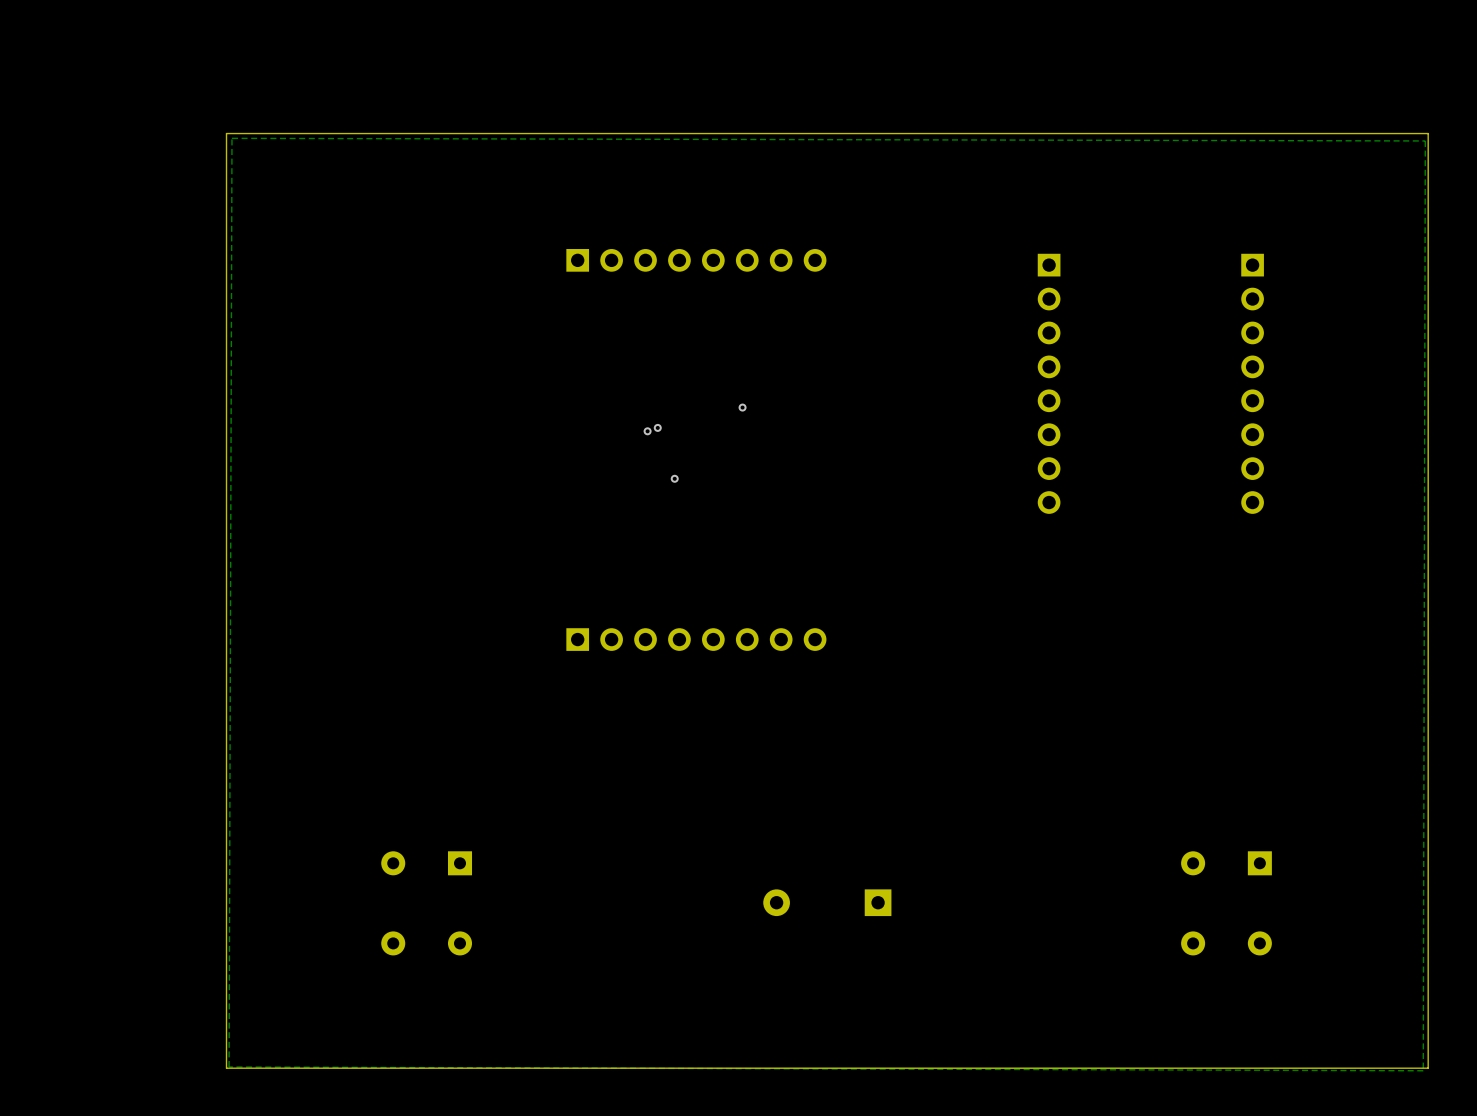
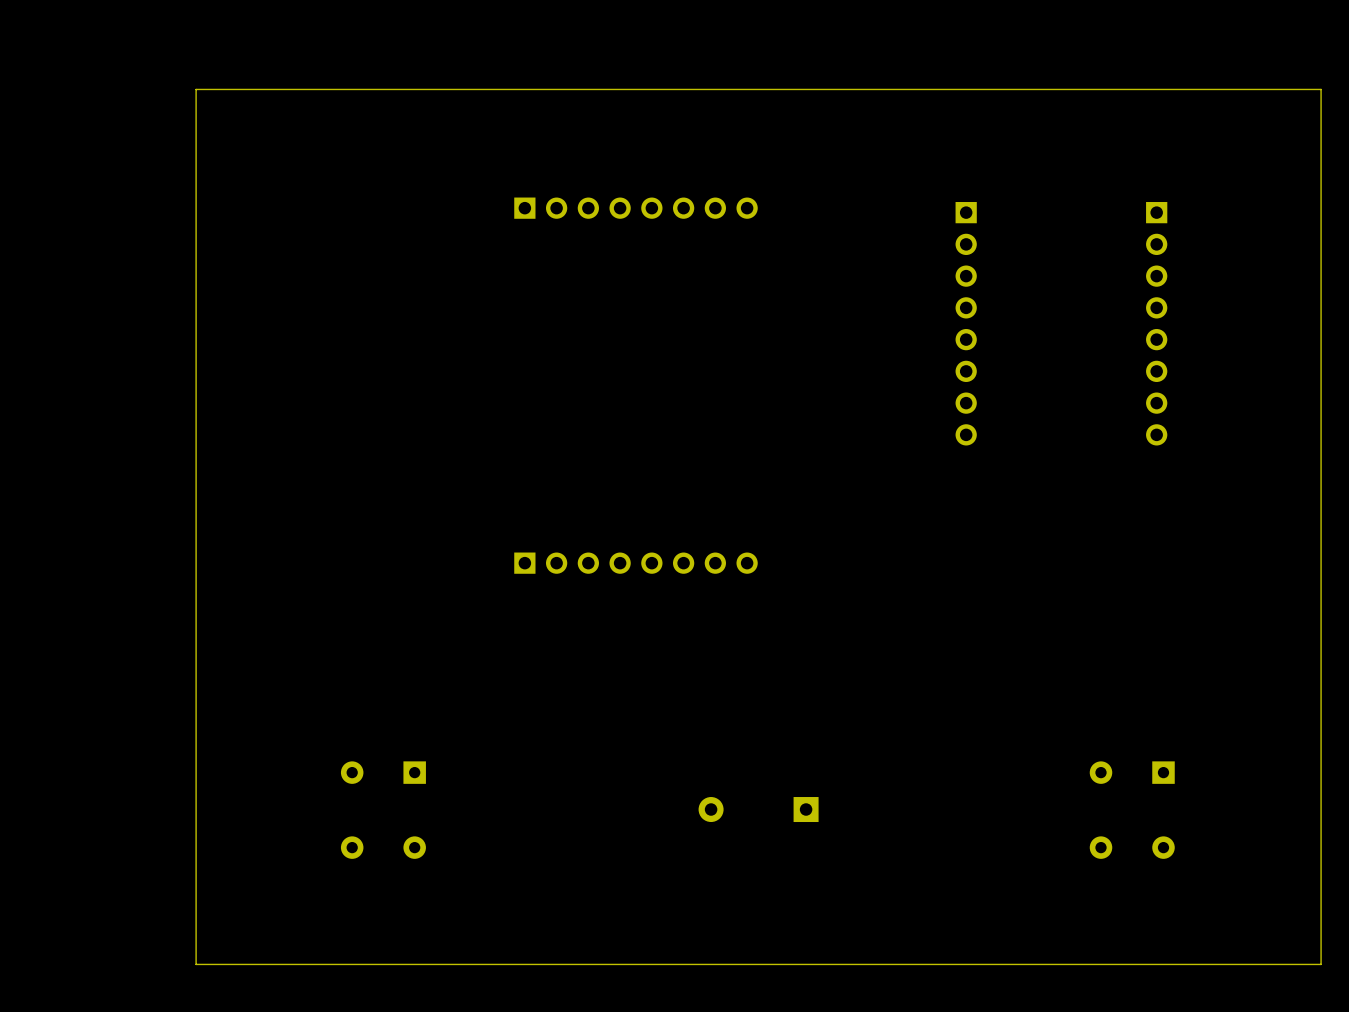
zone outline: (231, 138) (1425, 140) (1423, 1070) (229, 1067) (231, 138) -> none
via: (742, 407) -> none
via: (657, 427) -> none
via: (647, 431) -> none
via: (674, 478) -> none

